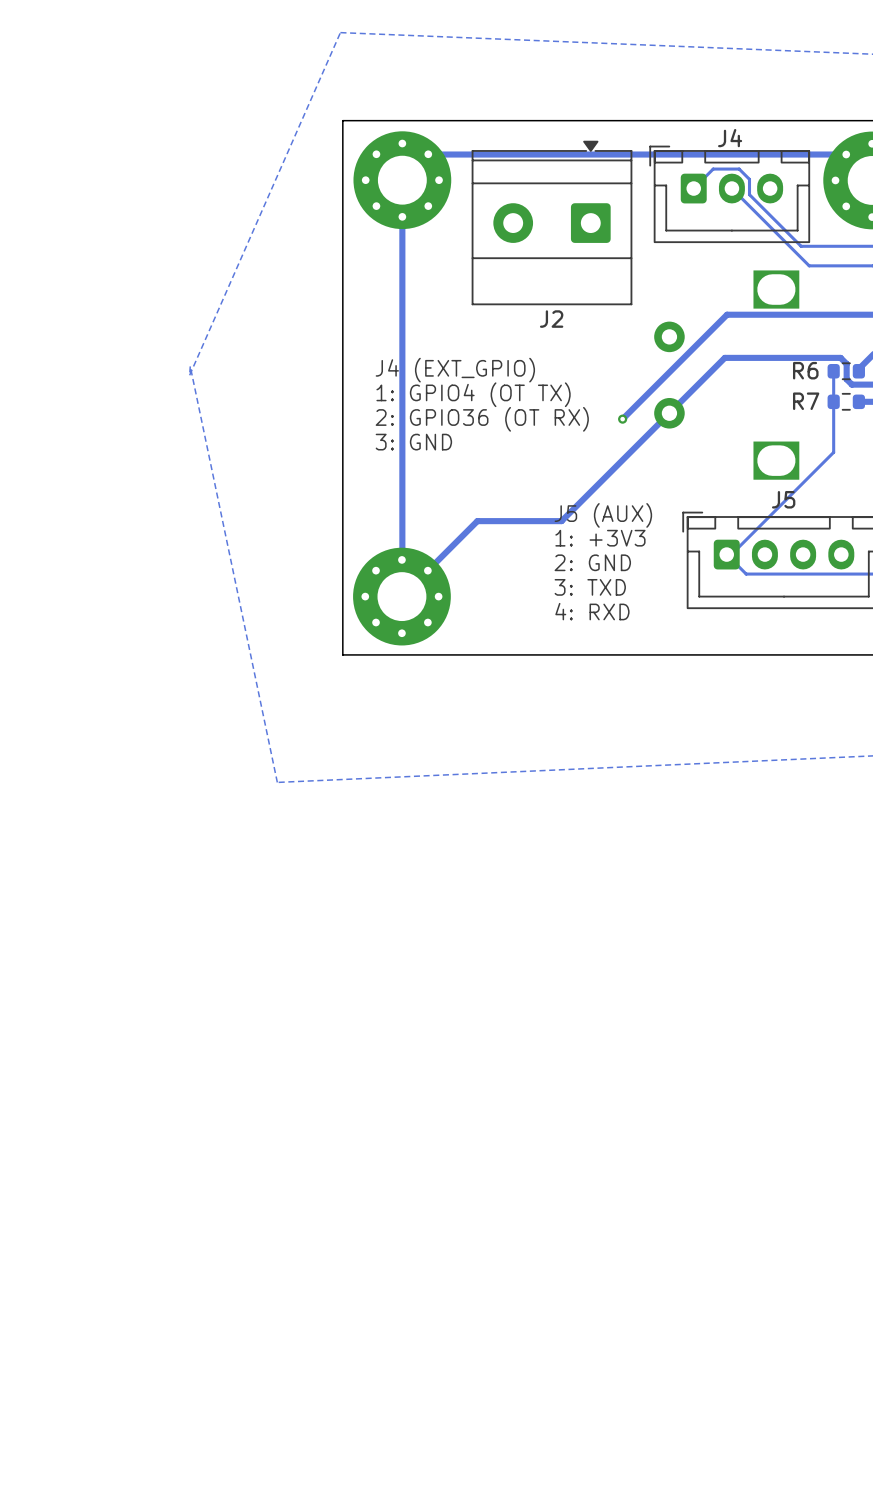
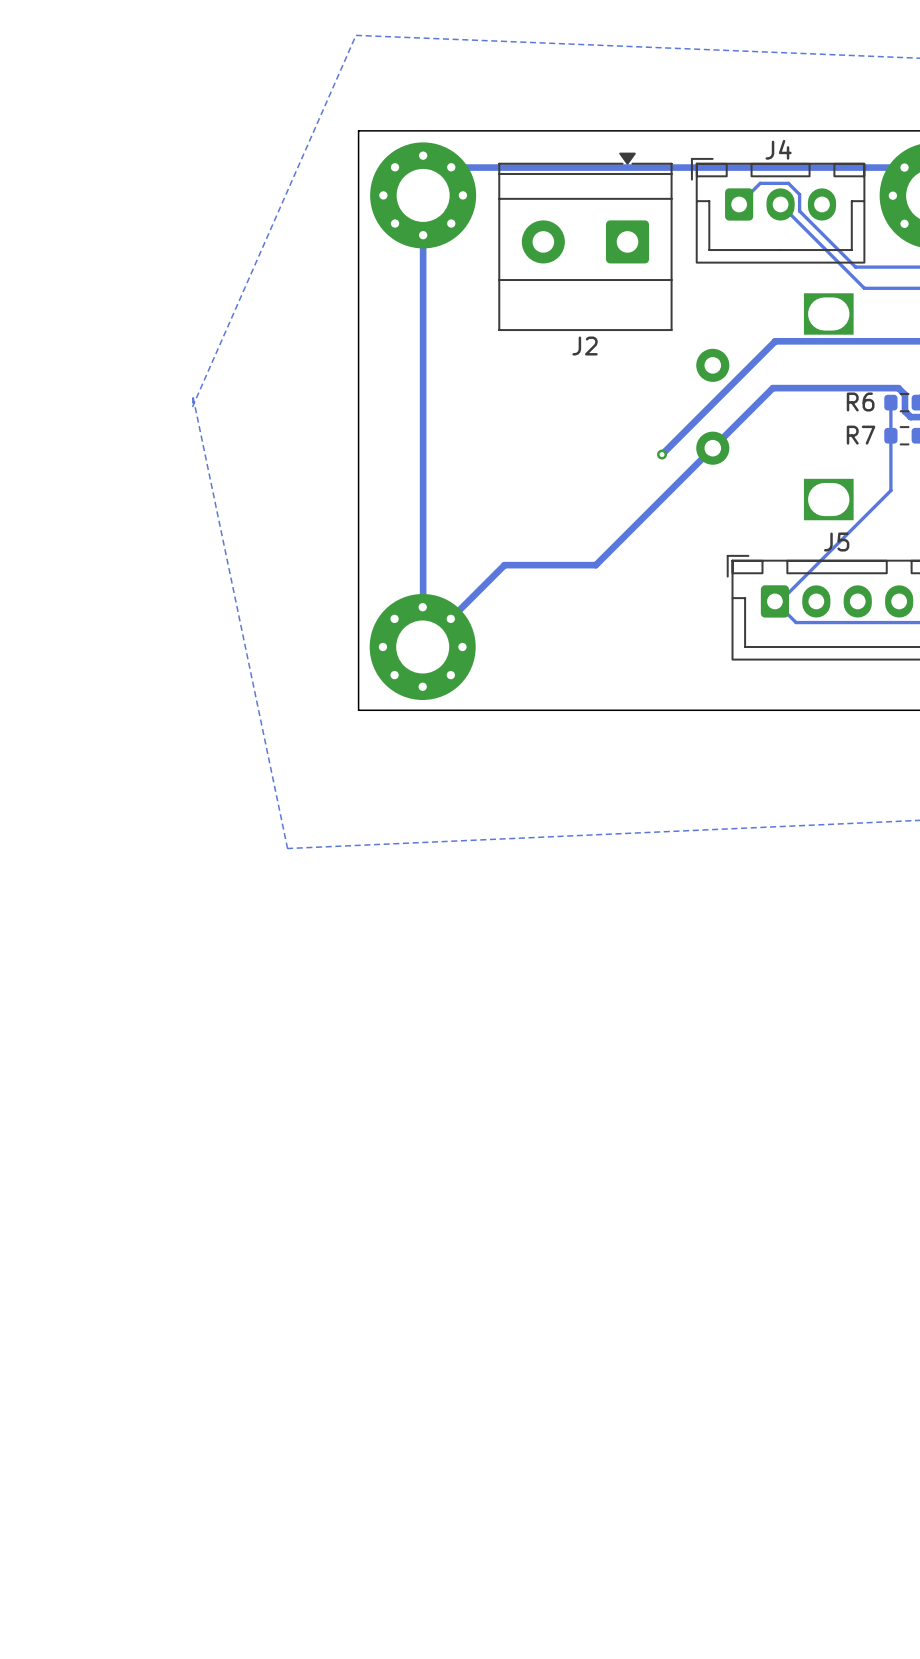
text: J4 (EXT_GPIO) (455, 370) -> none
text: 1: GPIO4 (OT TX) (473, 394) -> none
text: 2: GPIO36 (OT RX) (482, 419) -> none
text: 3: GND (413, 442) -> none
text: J5 (AUX) (603, 515) -> none
text: 1: +3V3 (600, 538) -> none
text: 2: GND (592, 562) -> none
text: 3: TXD (590, 587) -> none
text: 4: RXD (592, 611) -> none

